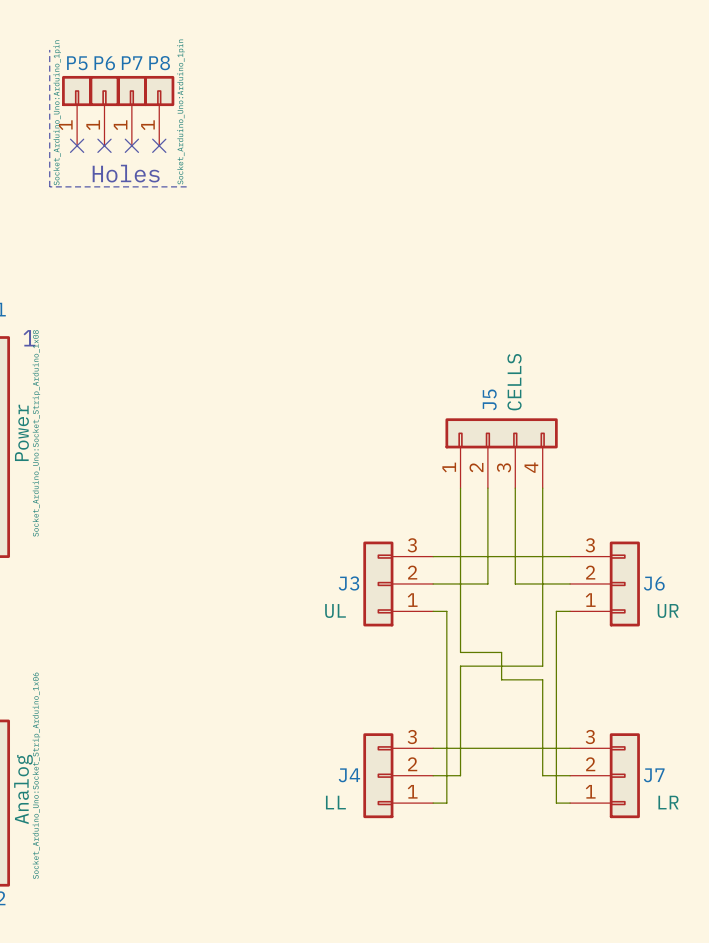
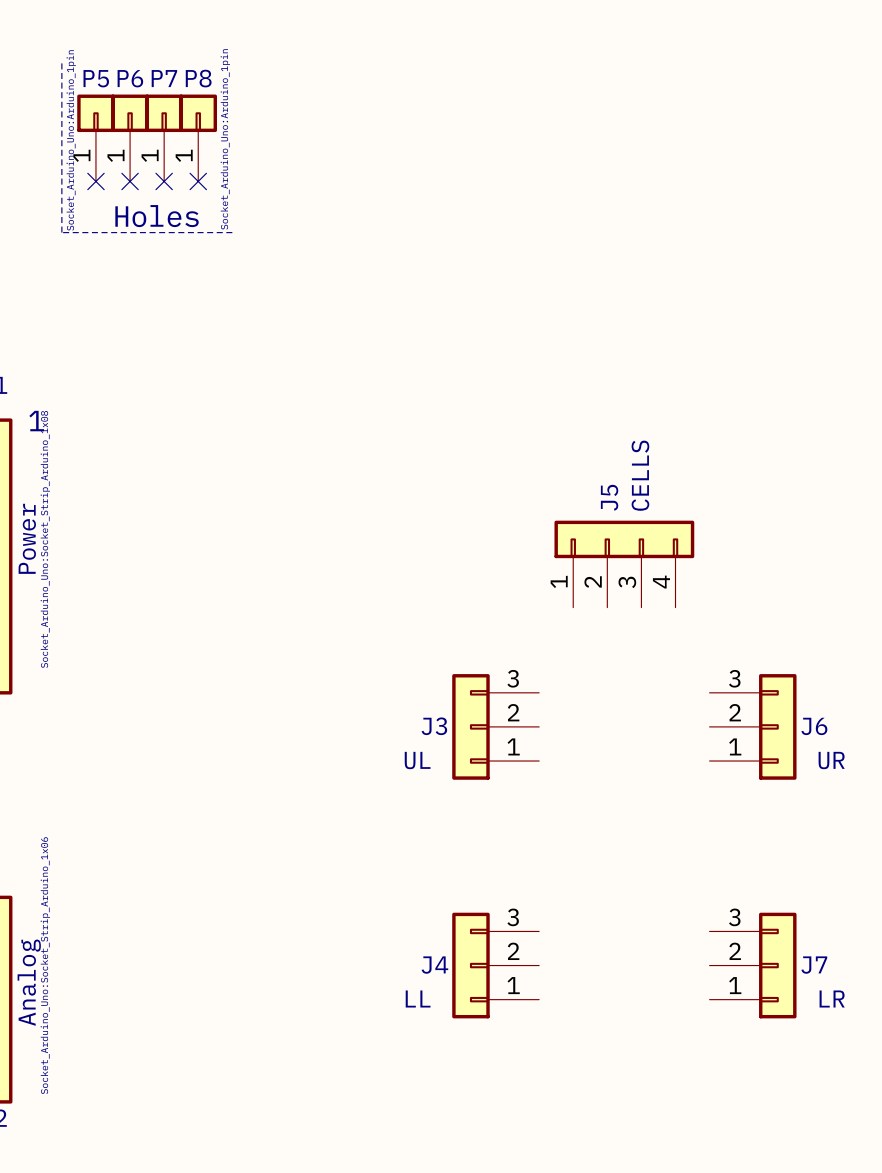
wire: (460, 488) (460, 652) (501, 652) (501, 679) (542, 679) (542, 775) (570, 775) -> none
wire: (487, 488) (487, 583) (433, 583) -> none
wire: (515, 488) (515, 583) (570, 583) -> none
wire: (542, 488) (542, 666) (460, 666) (460, 775) (433, 775) -> none
wire: (433, 556) (570, 556) -> none
wire: (433, 611) (446, 611) (446, 803) (433, 803) -> none
wire: (570, 611) (556, 611) (556, 803) (570, 803) -> none
wire: (433, 748) (570, 748) -> none

